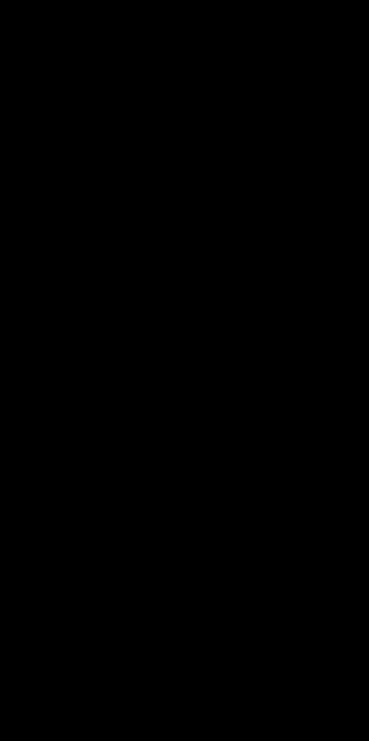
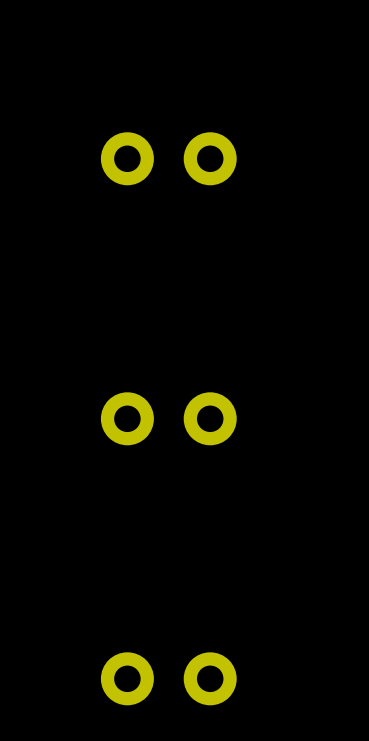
part: none -> (168, 158)
part: none -> (168, 418)
part: none -> (168, 678)

